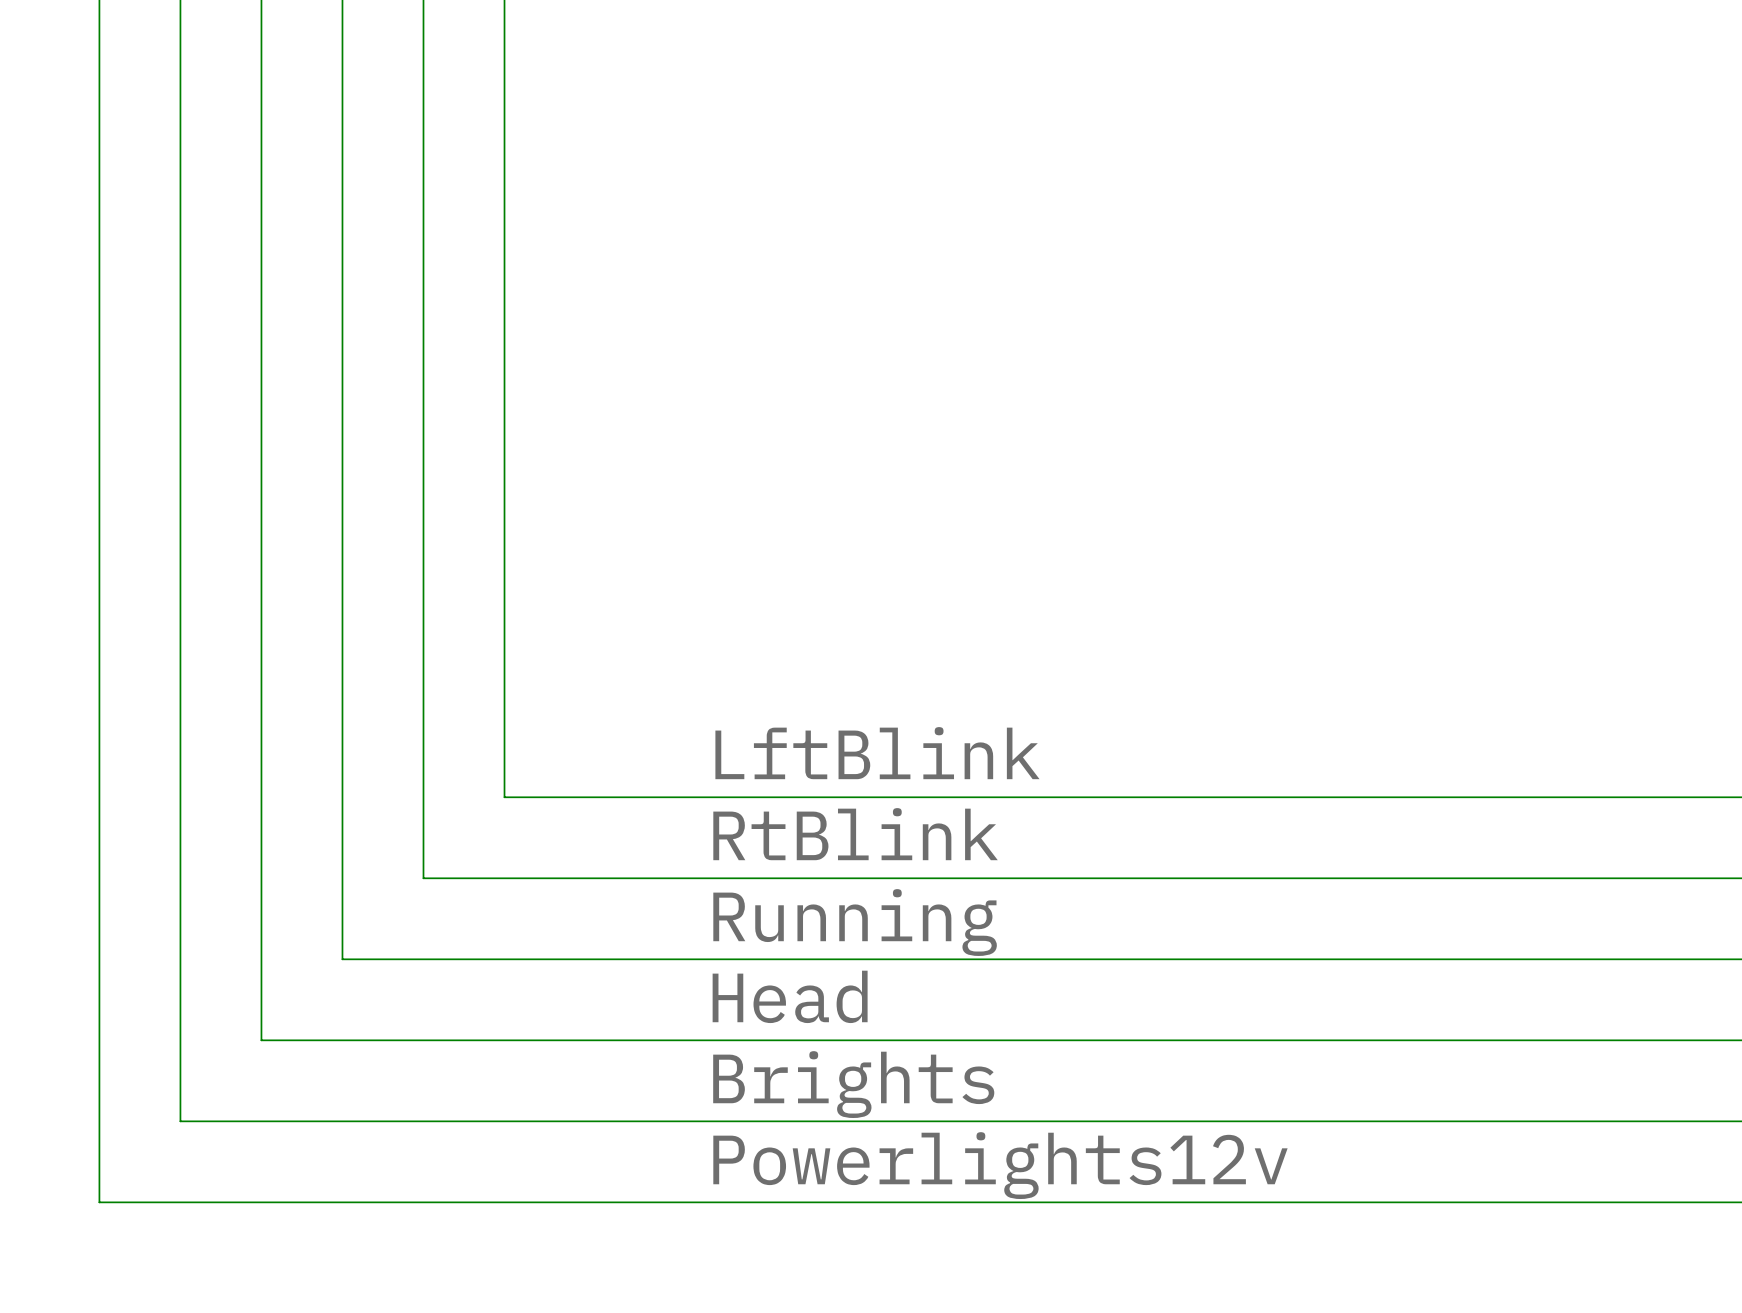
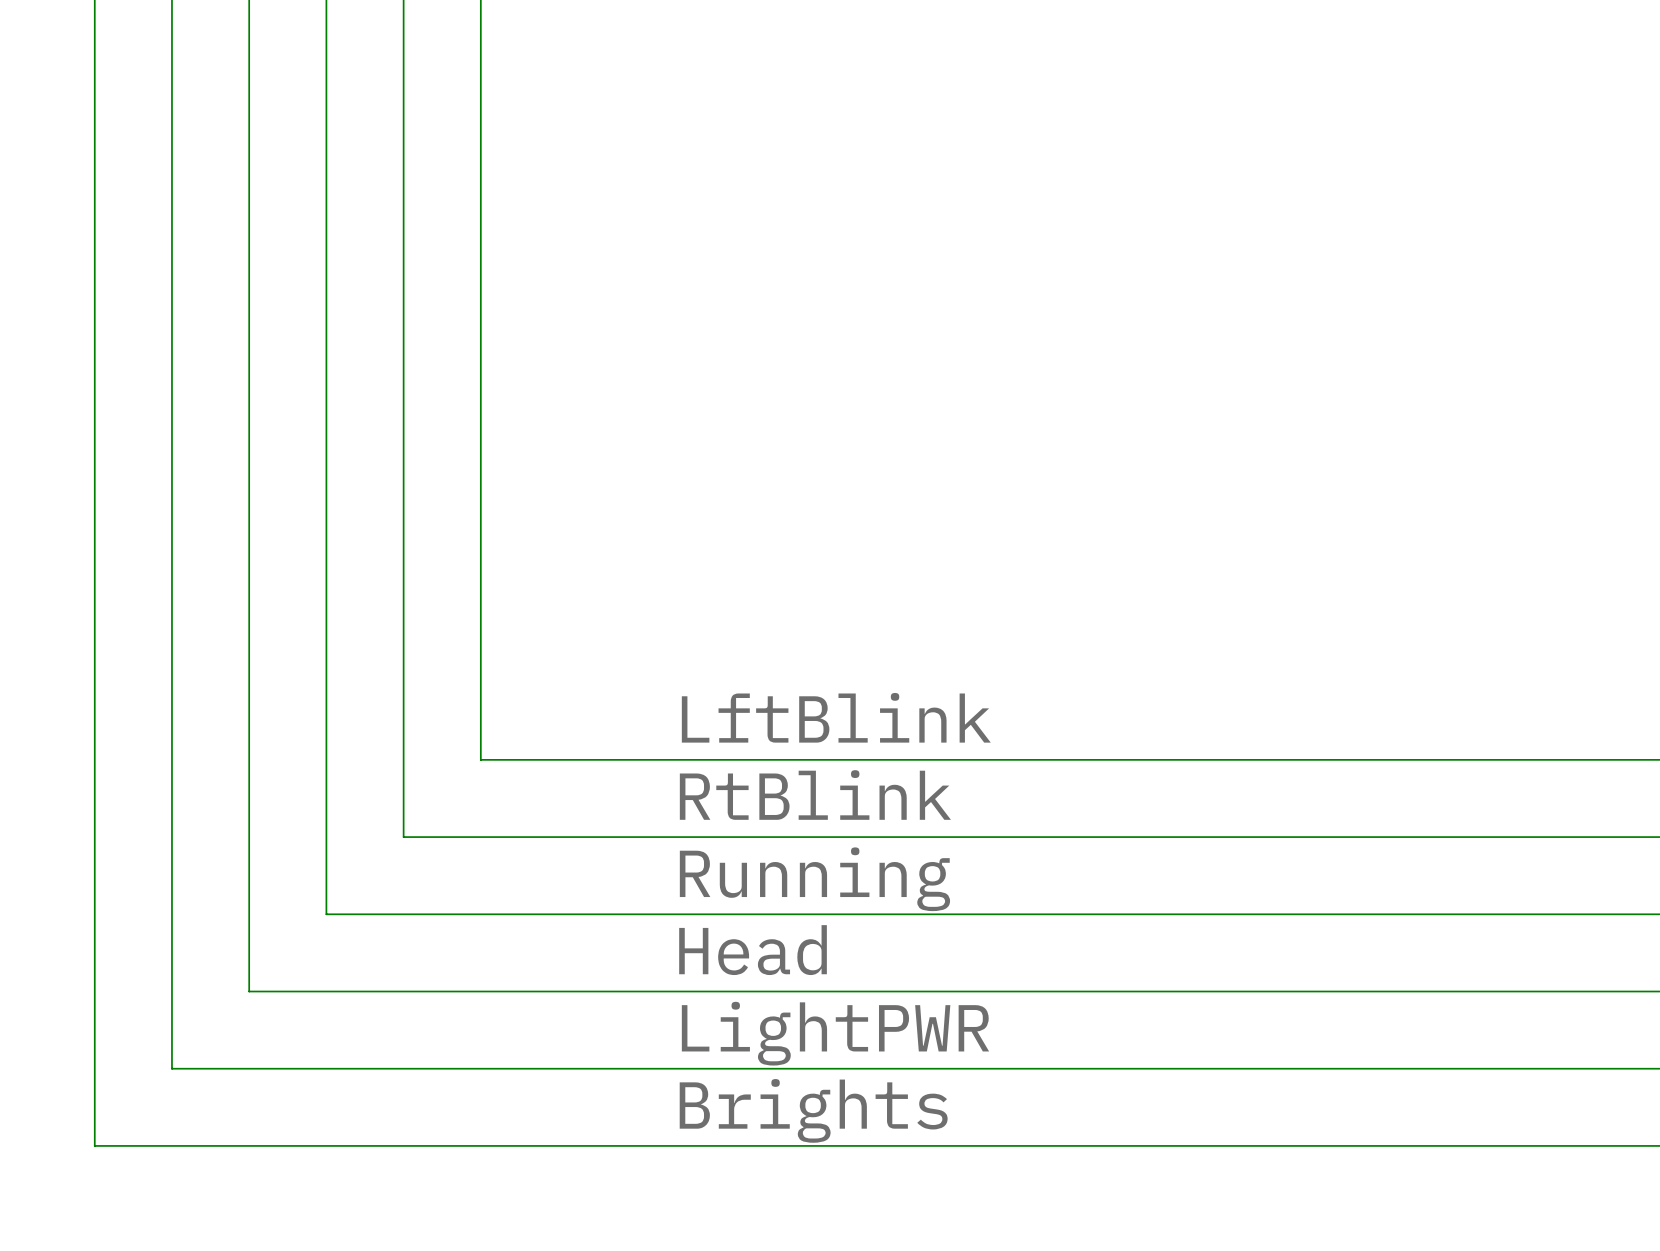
label: Brights (853, 1084) -> LightPWR (835, 1033)
label: Powerlights12v (1000, 1165) -> Brights (813, 1110)

